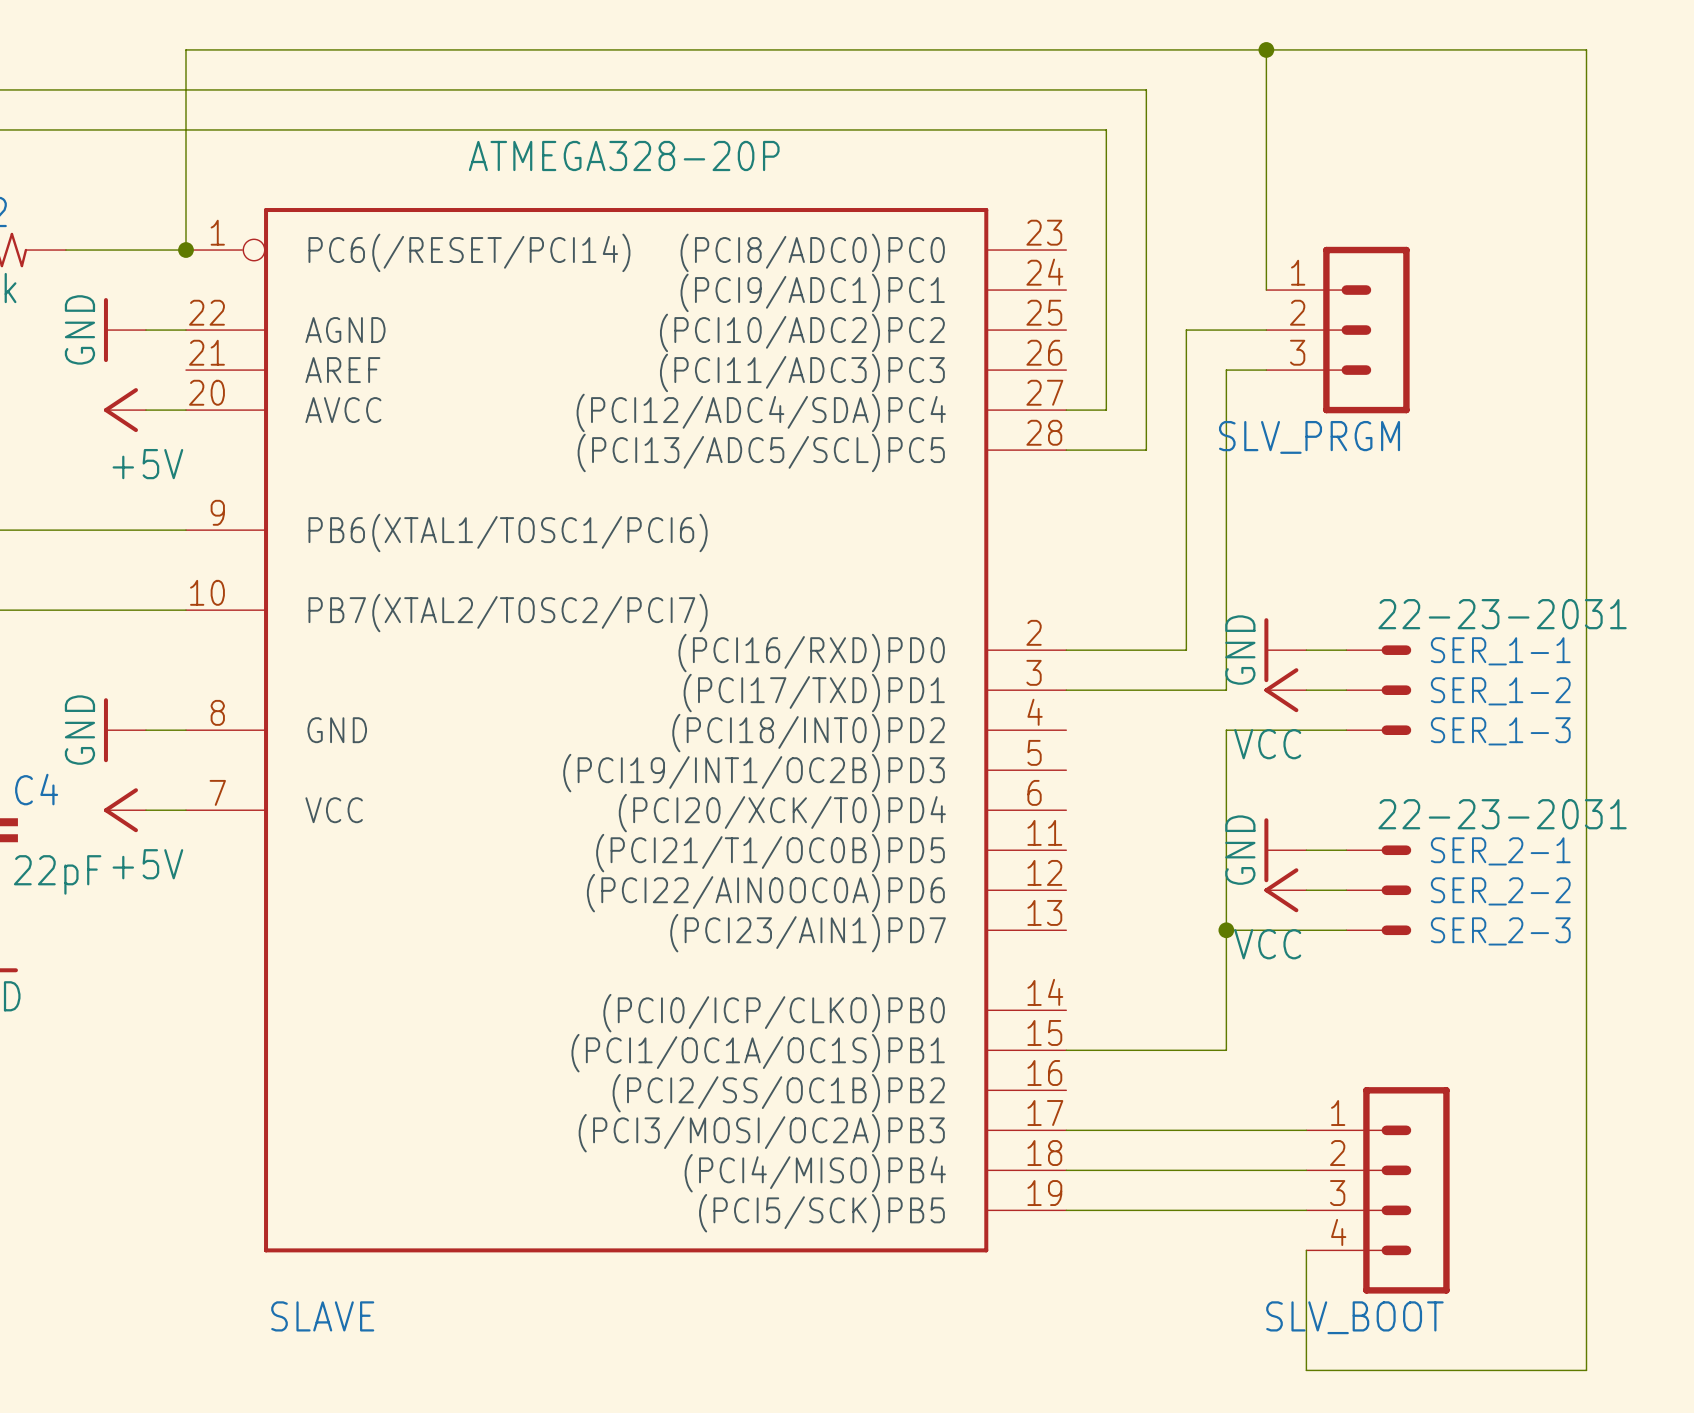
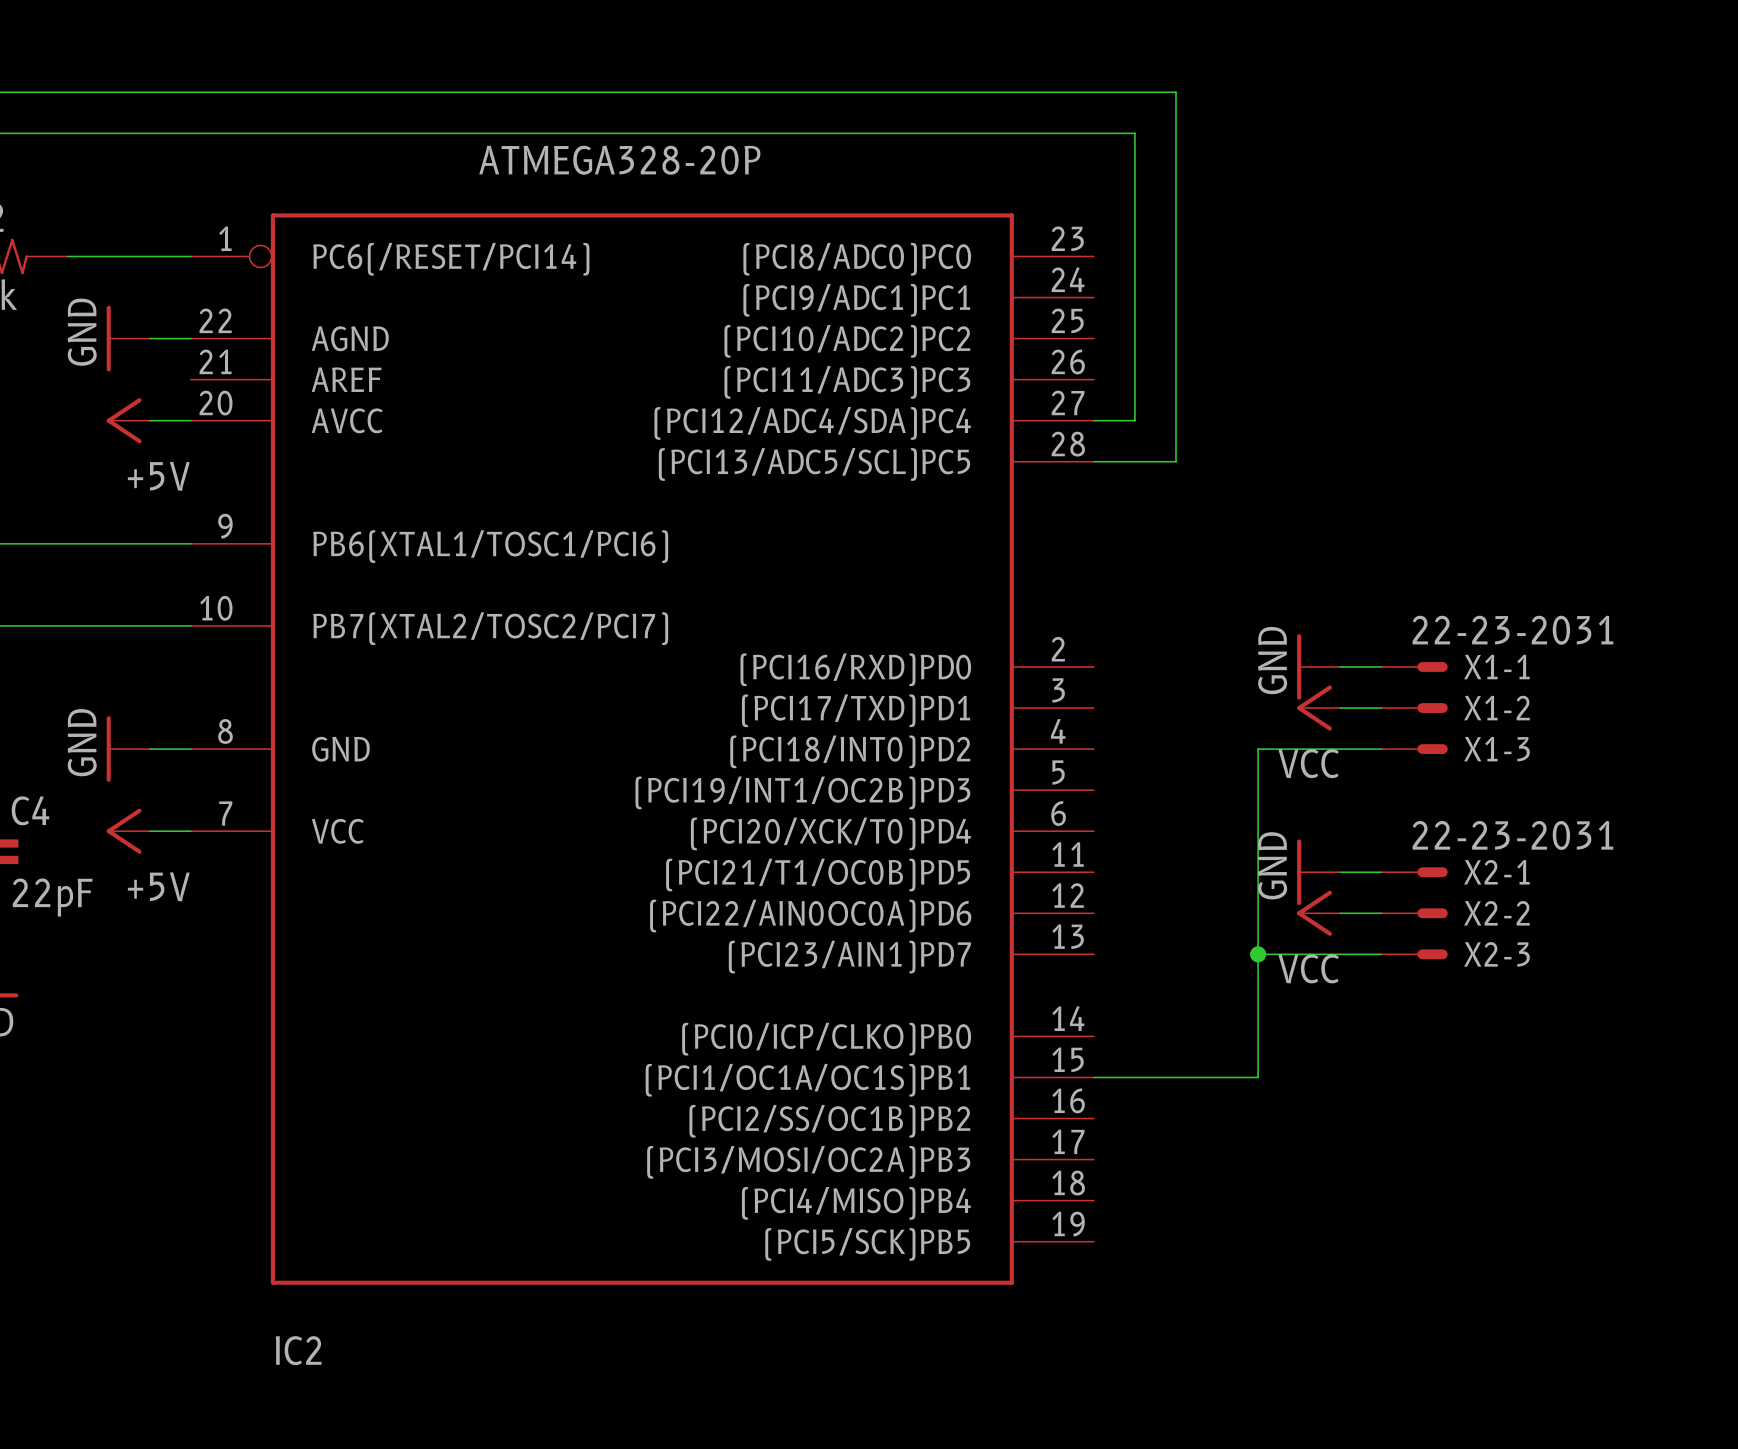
wire: (1266, 49) (1266, 290) -> none
junction: (1266, 49) -> none
wire: (186, 250) (186, 49) (1586, 49) (1586, 1370) (1306, 1370) (1306, 1250) -> none
junction: (186, 250) -> none
wire: (1266, 330) (1186, 330) (1186, 650) (1066, 650) -> none
SLV_PRGM: (1338, 330) -> none
wire: (1266, 370) (1226, 370) (1226, 690) (1066, 690) -> none
SER_1-1 name: SER_1-1 (1500, 651) -> X1-1 (1496, 666)
SER_1-2 name: SER_1-2 (1500, 691) -> X1-2 (1496, 708)
SER_1-3 name: SER_1-3 (1500, 731) -> X1-3 (1496, 749)
SER_2-1 name: SER_2-1 (1500, 851) -> X2-1 (1496, 872)
SER_2-2 name: SER_2-2 (1500, 891) -> X2-2 (1496, 913)
SER_2-3 name: SER_2-3 (1500, 931) -> X2-3 (1496, 954)
wire: (1066, 1130) (1306, 1130) -> none
wire: (1066, 1170) (1306, 1170) -> none
SLV_BOOT: (1378, 1190) -> none
wire: (1066, 1210) (1306, 1210) -> none
SLAVE name: SLAVE (322, 1316) -> IC2 (298, 1350)

